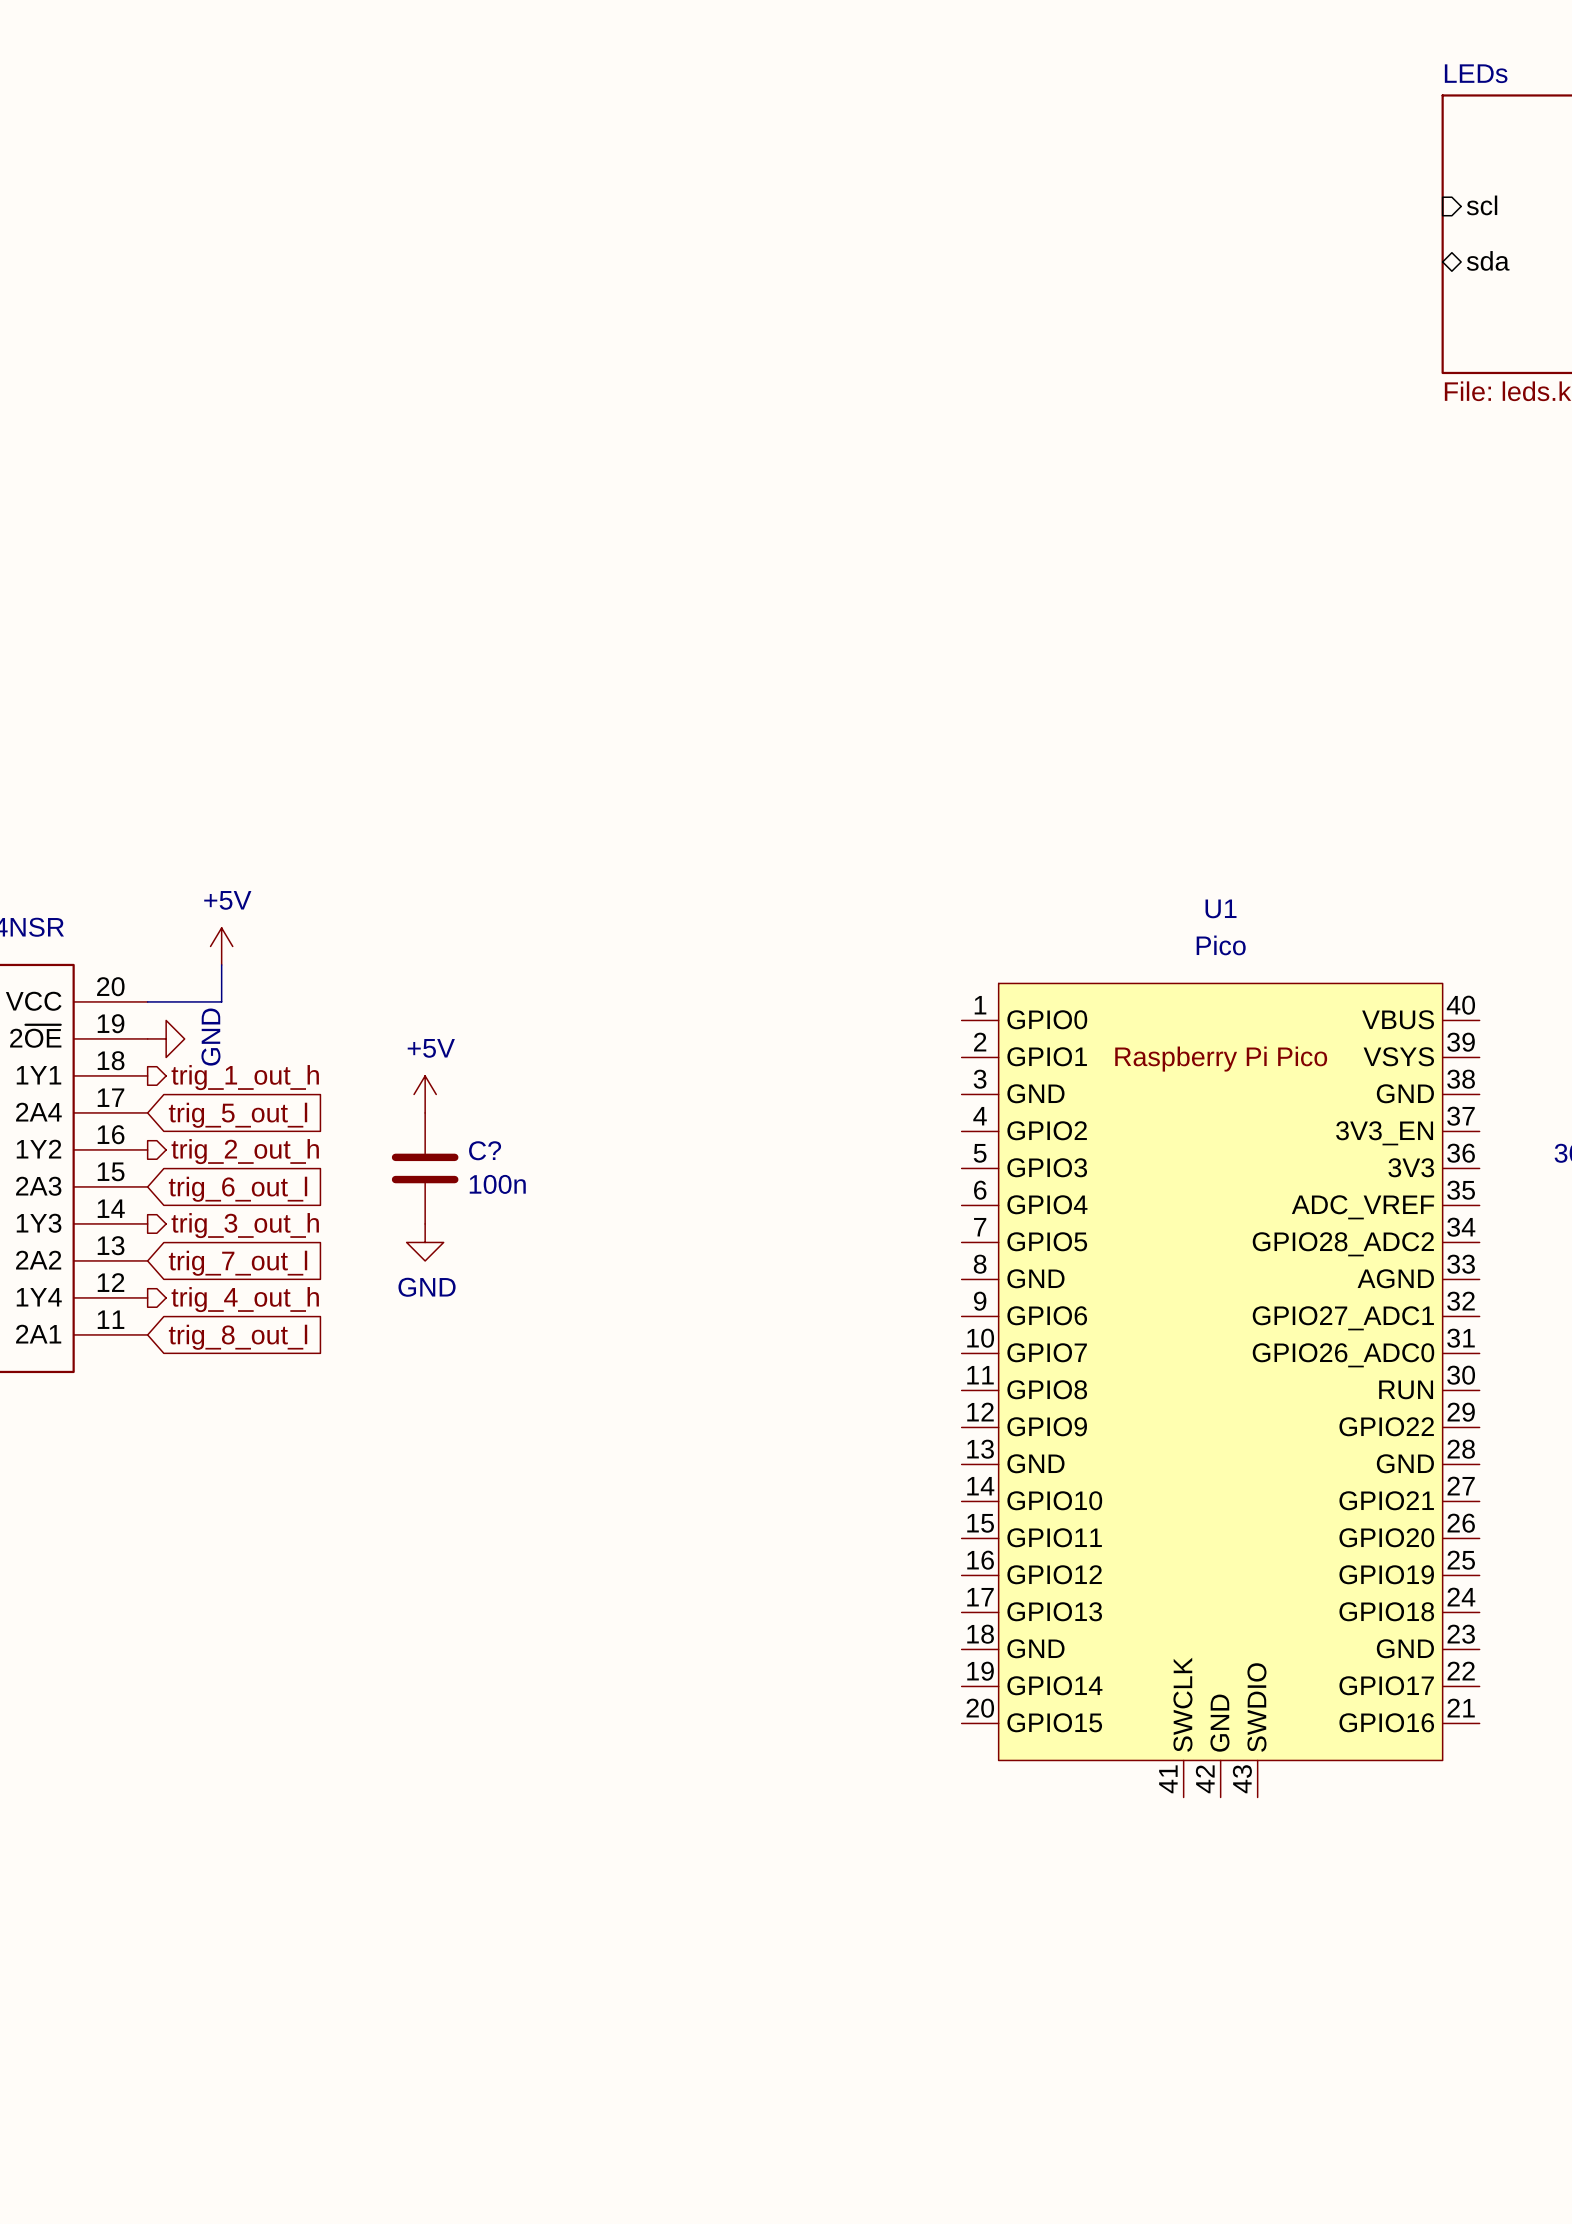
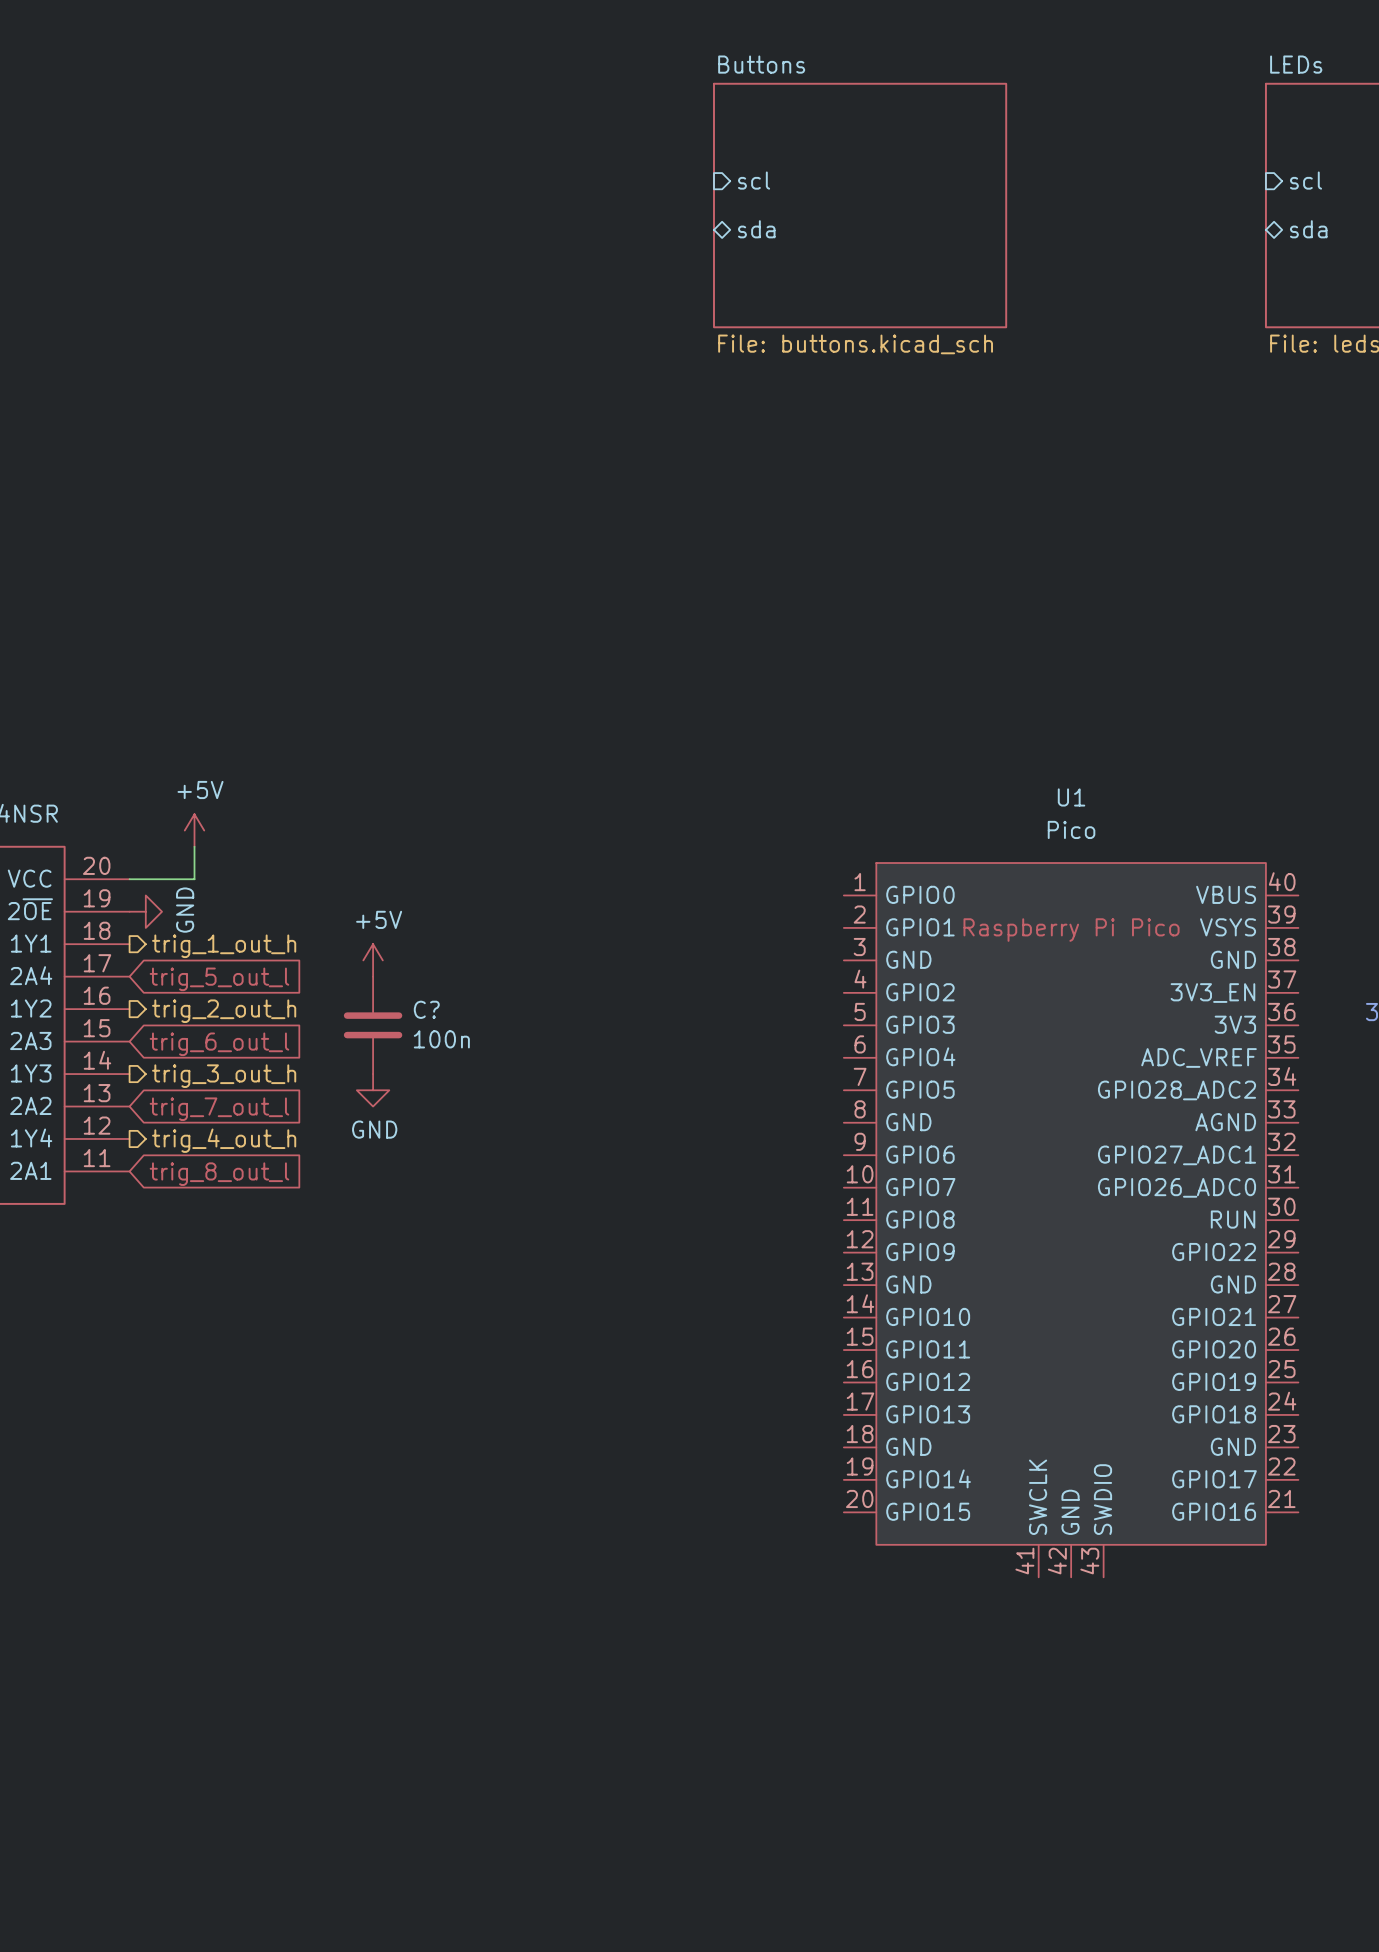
sheet pin: none -> scl (754, 180)
sheet Buttons: none -> File: buttons.kicad_sch (860, 205)
sheet pin: none -> sda (756, 229)

